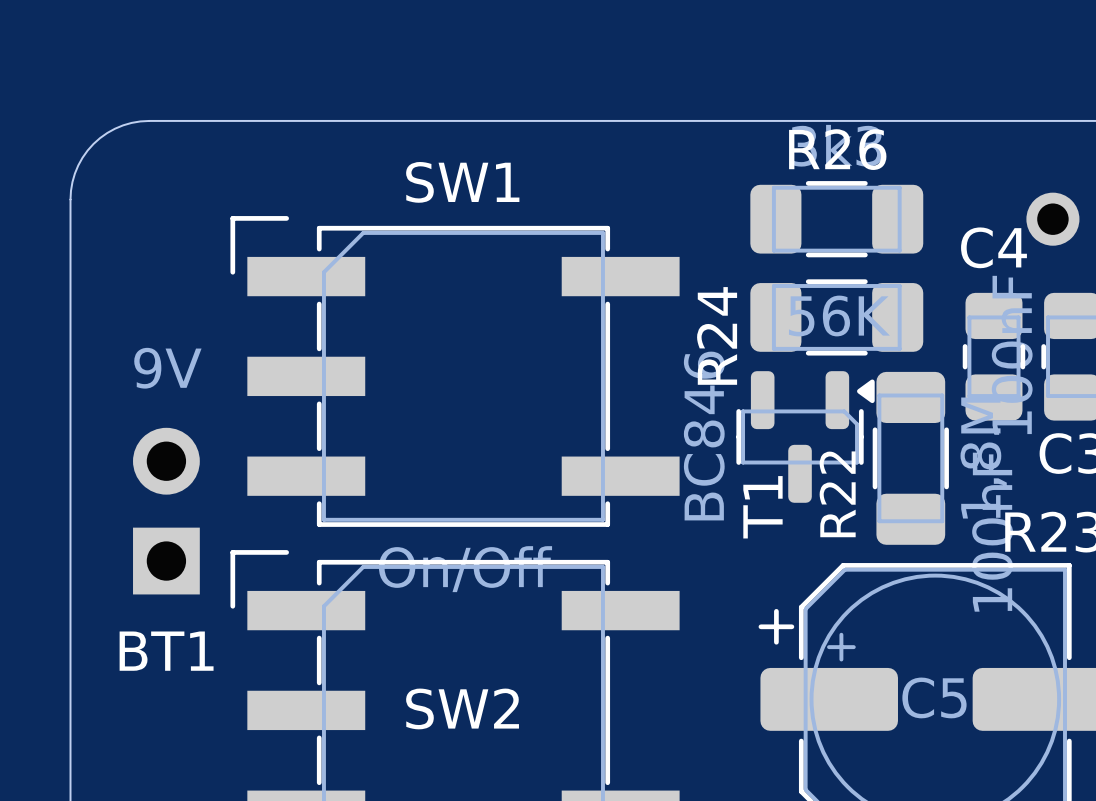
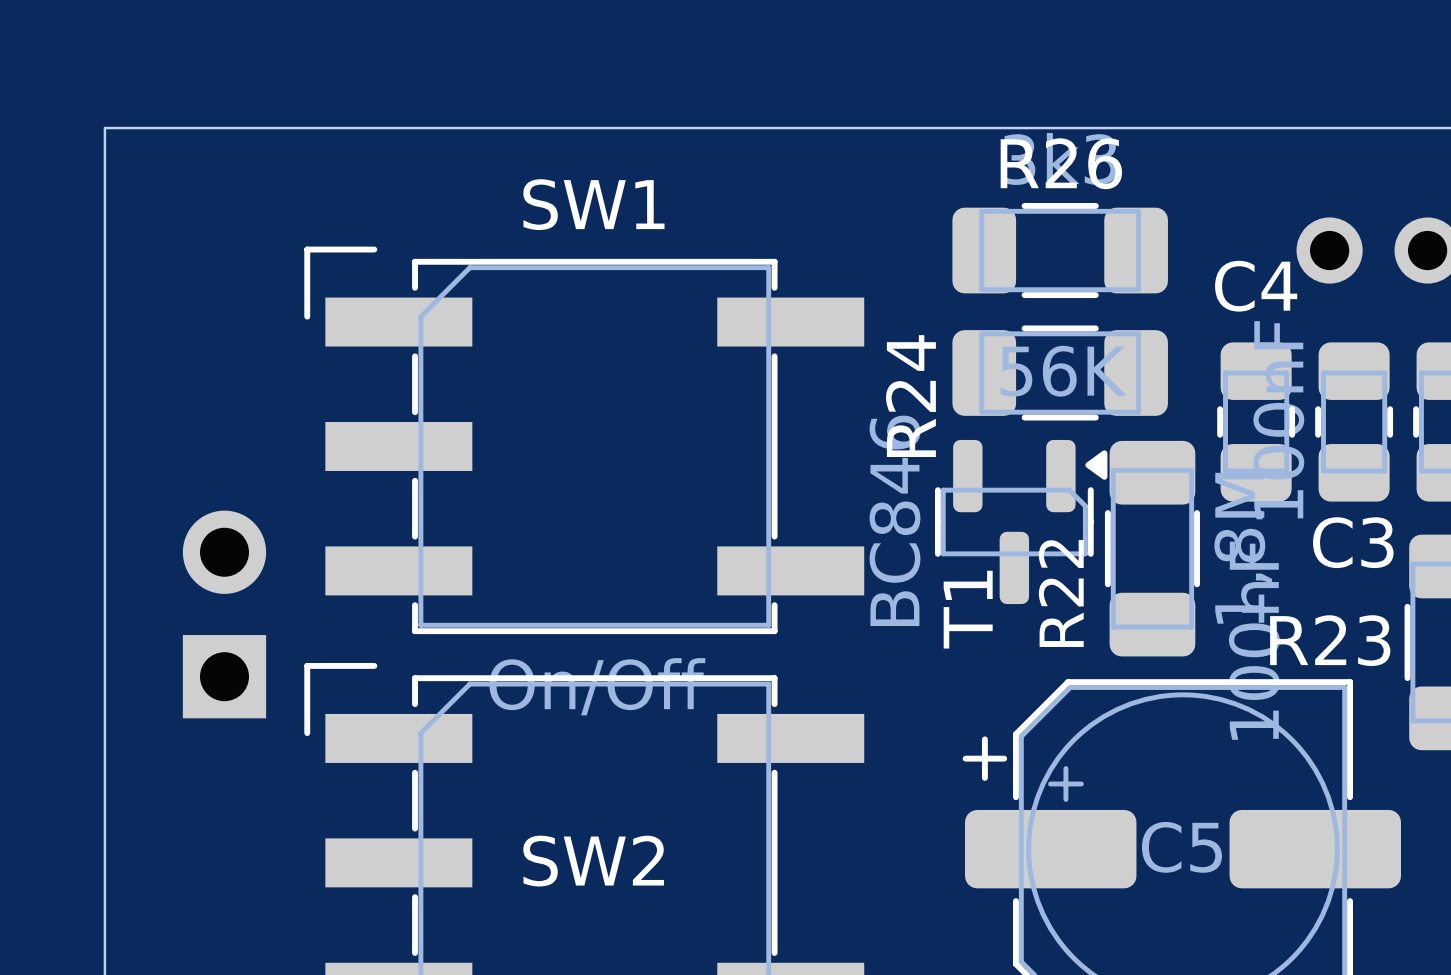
board edge: (149, 120) (123, 125) (107, 132) (93, 143) (82, 157) (74, 173) (70, 199) -> (202, 128) (104, 128) (104, 226)
BT1 value: 9V (167, 368) -> none
BT1 name: BT1 (166, 651) -> none

